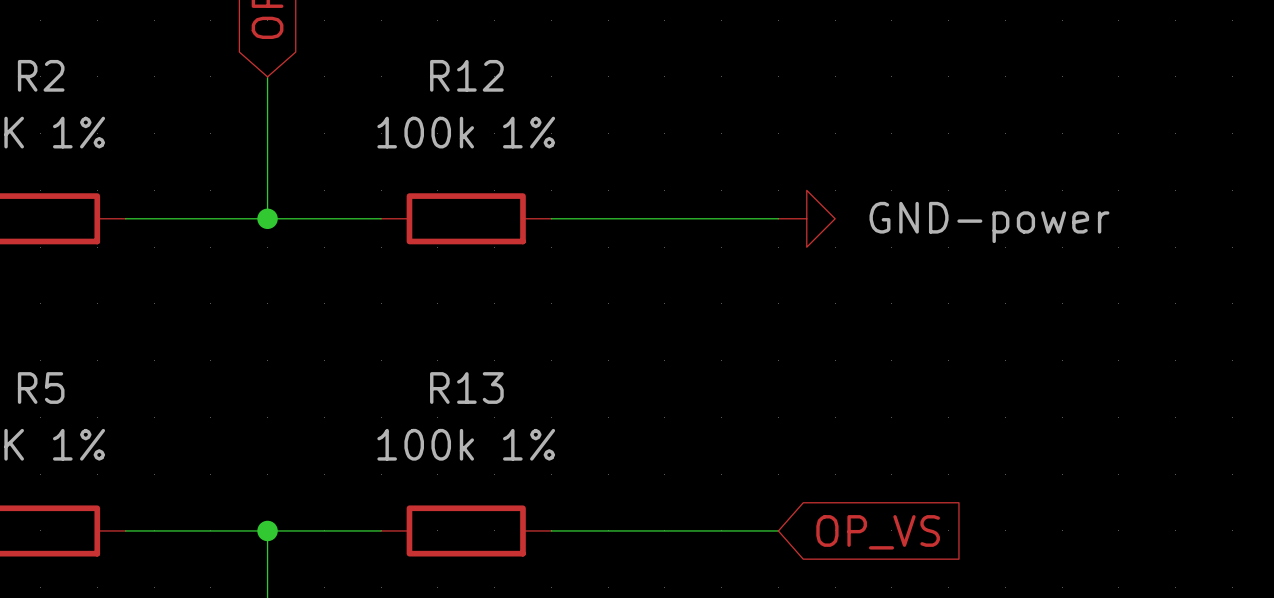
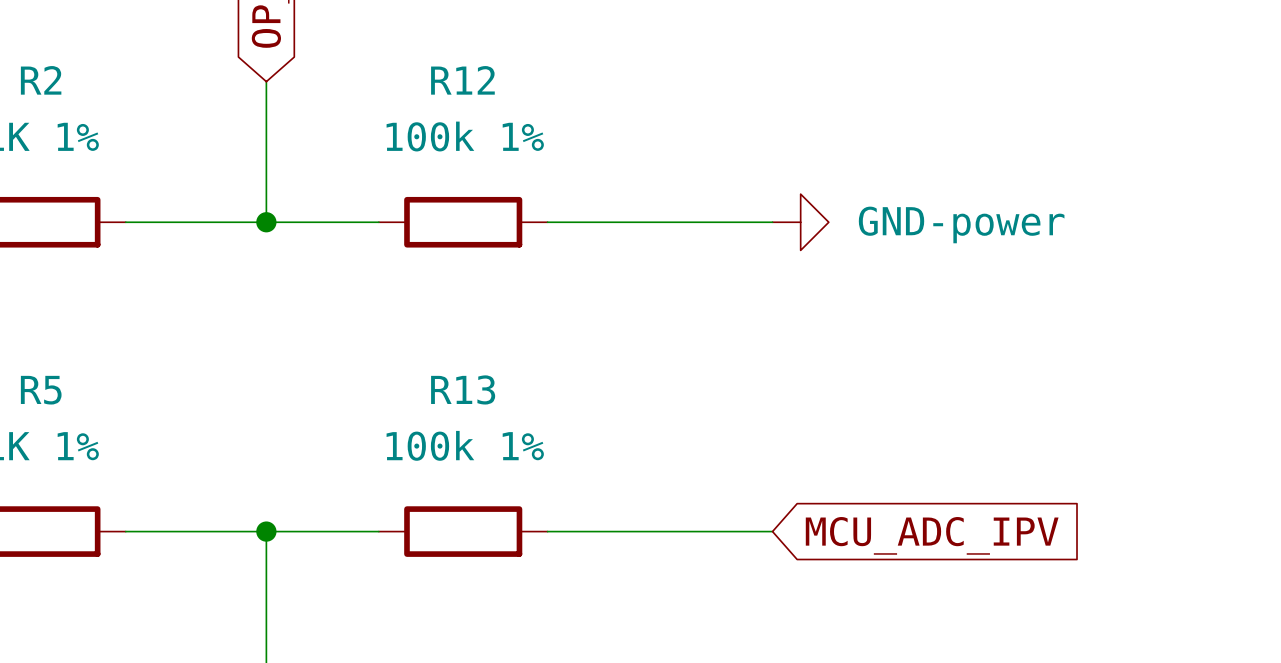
global label: OP_VS (878, 532) -> MCU_ADC_IPV (932, 535)

